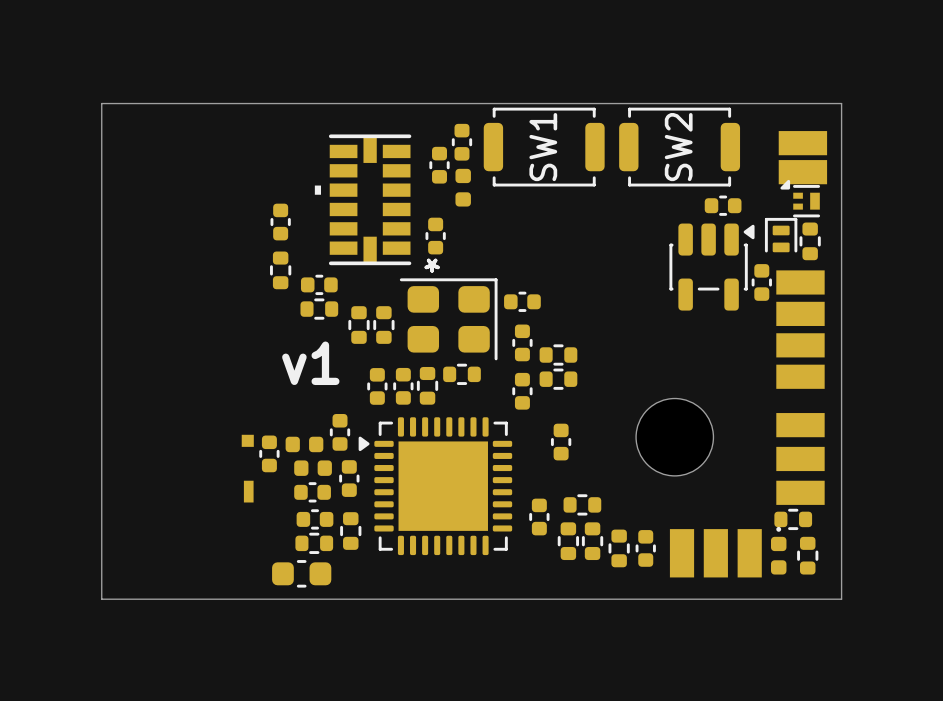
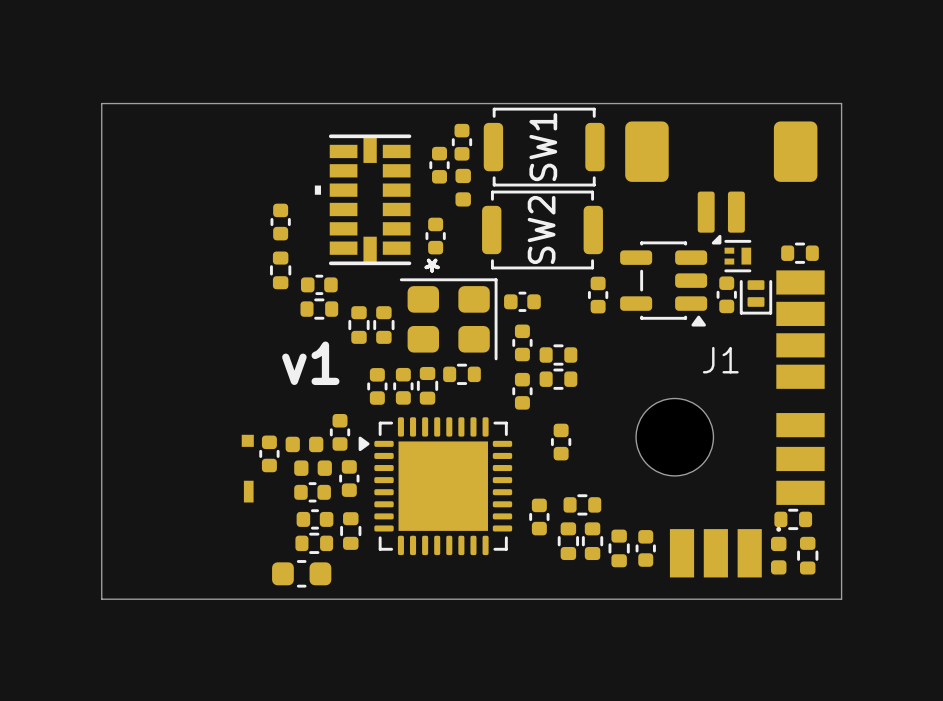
part: (802, 143) -> none
SW2 position: (679, 147) -> (542, 230)
part: (802, 172) -> none
J1: none -> (721, 177)
part position: (800, 198) -> (731, 253)
part: (723, 205) -> none
part: (781, 235) -> none
part rotation: 0° (810, 241) -> 90° clockwise (800, 253)
part footprint: [751, 264, 772, 301] -> [739, 279, 773, 315]
part rotation: 0° (711, 267) -> 90° clockwise (663, 283)
part: none -> (726, 294)
part: none -> (598, 295)

